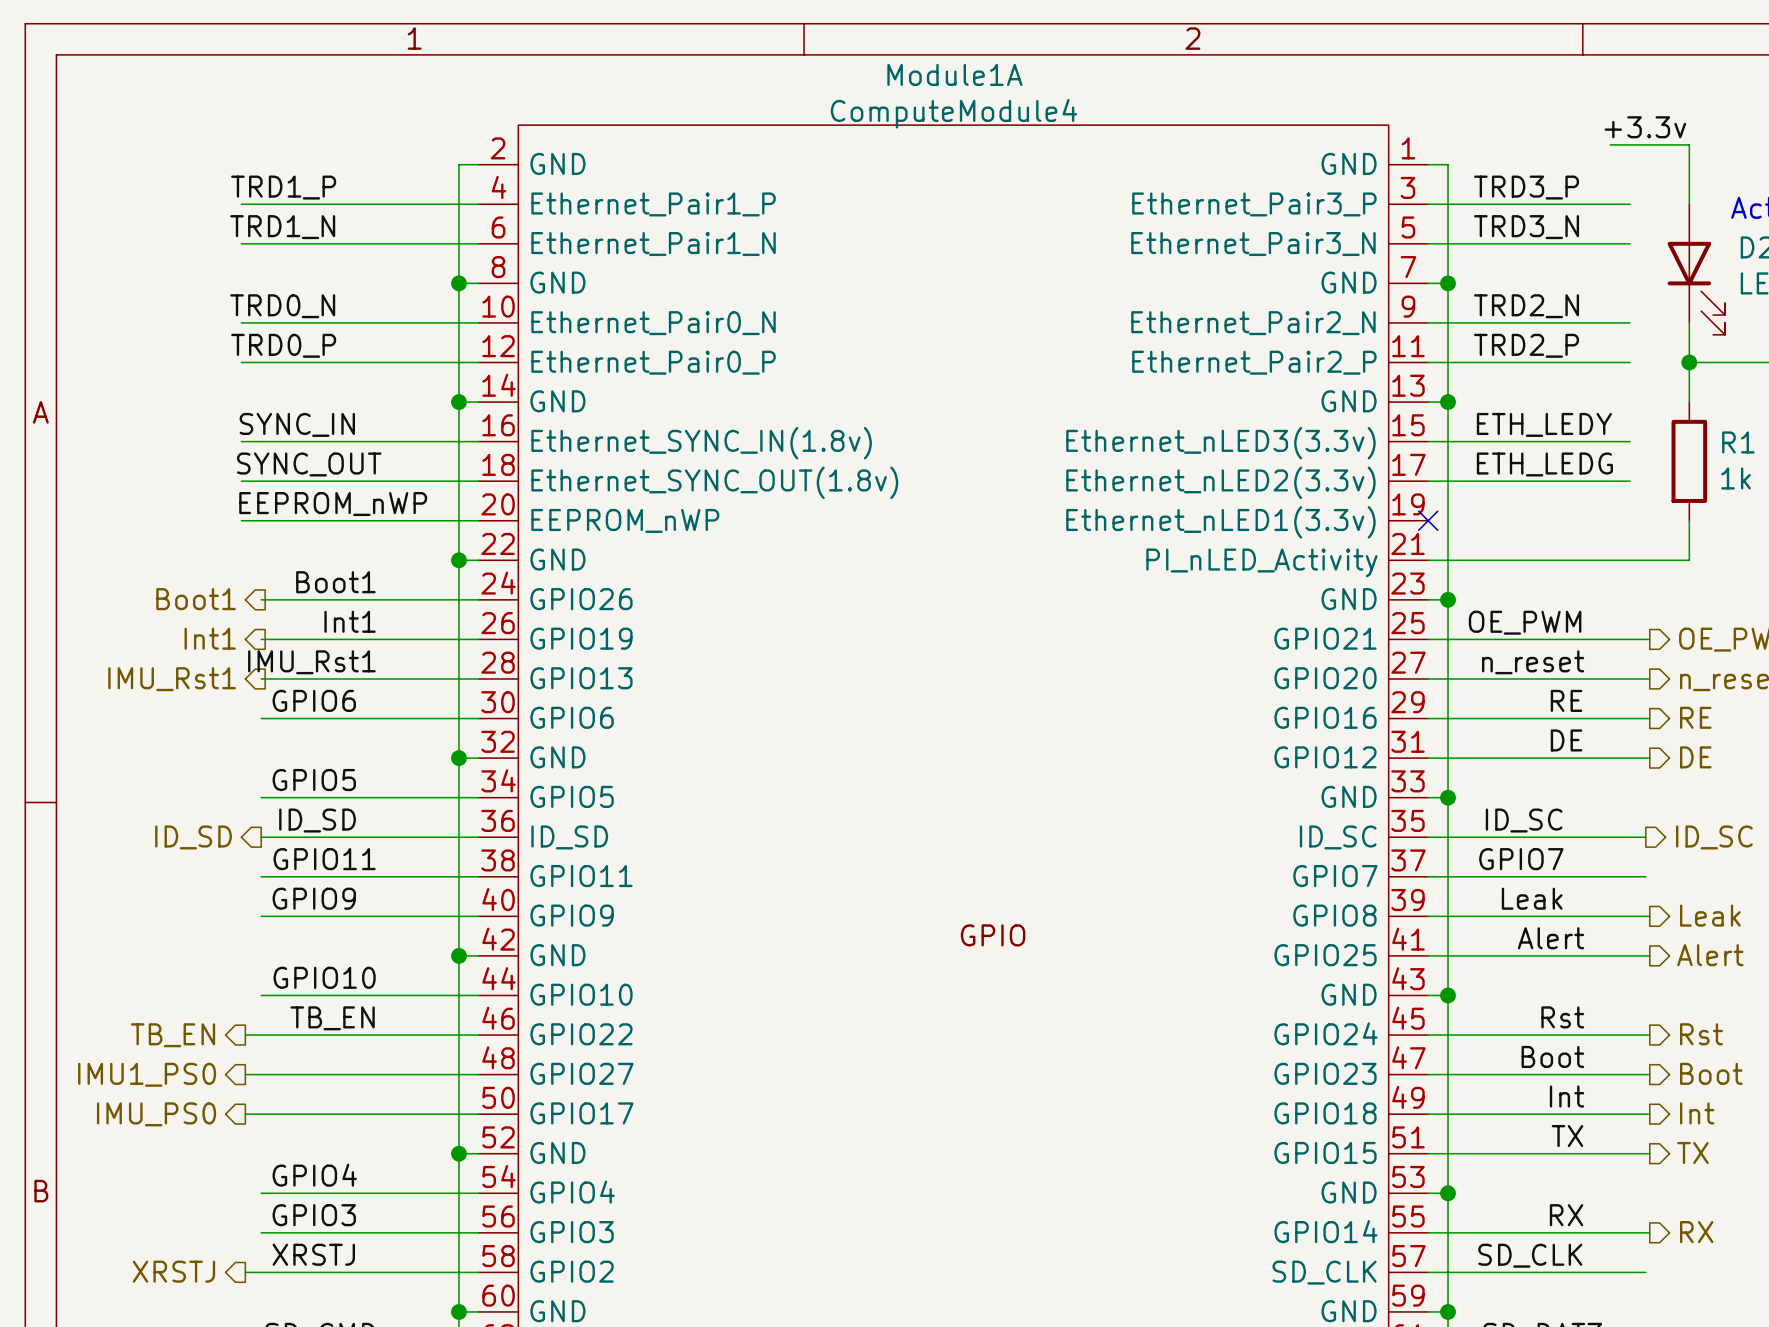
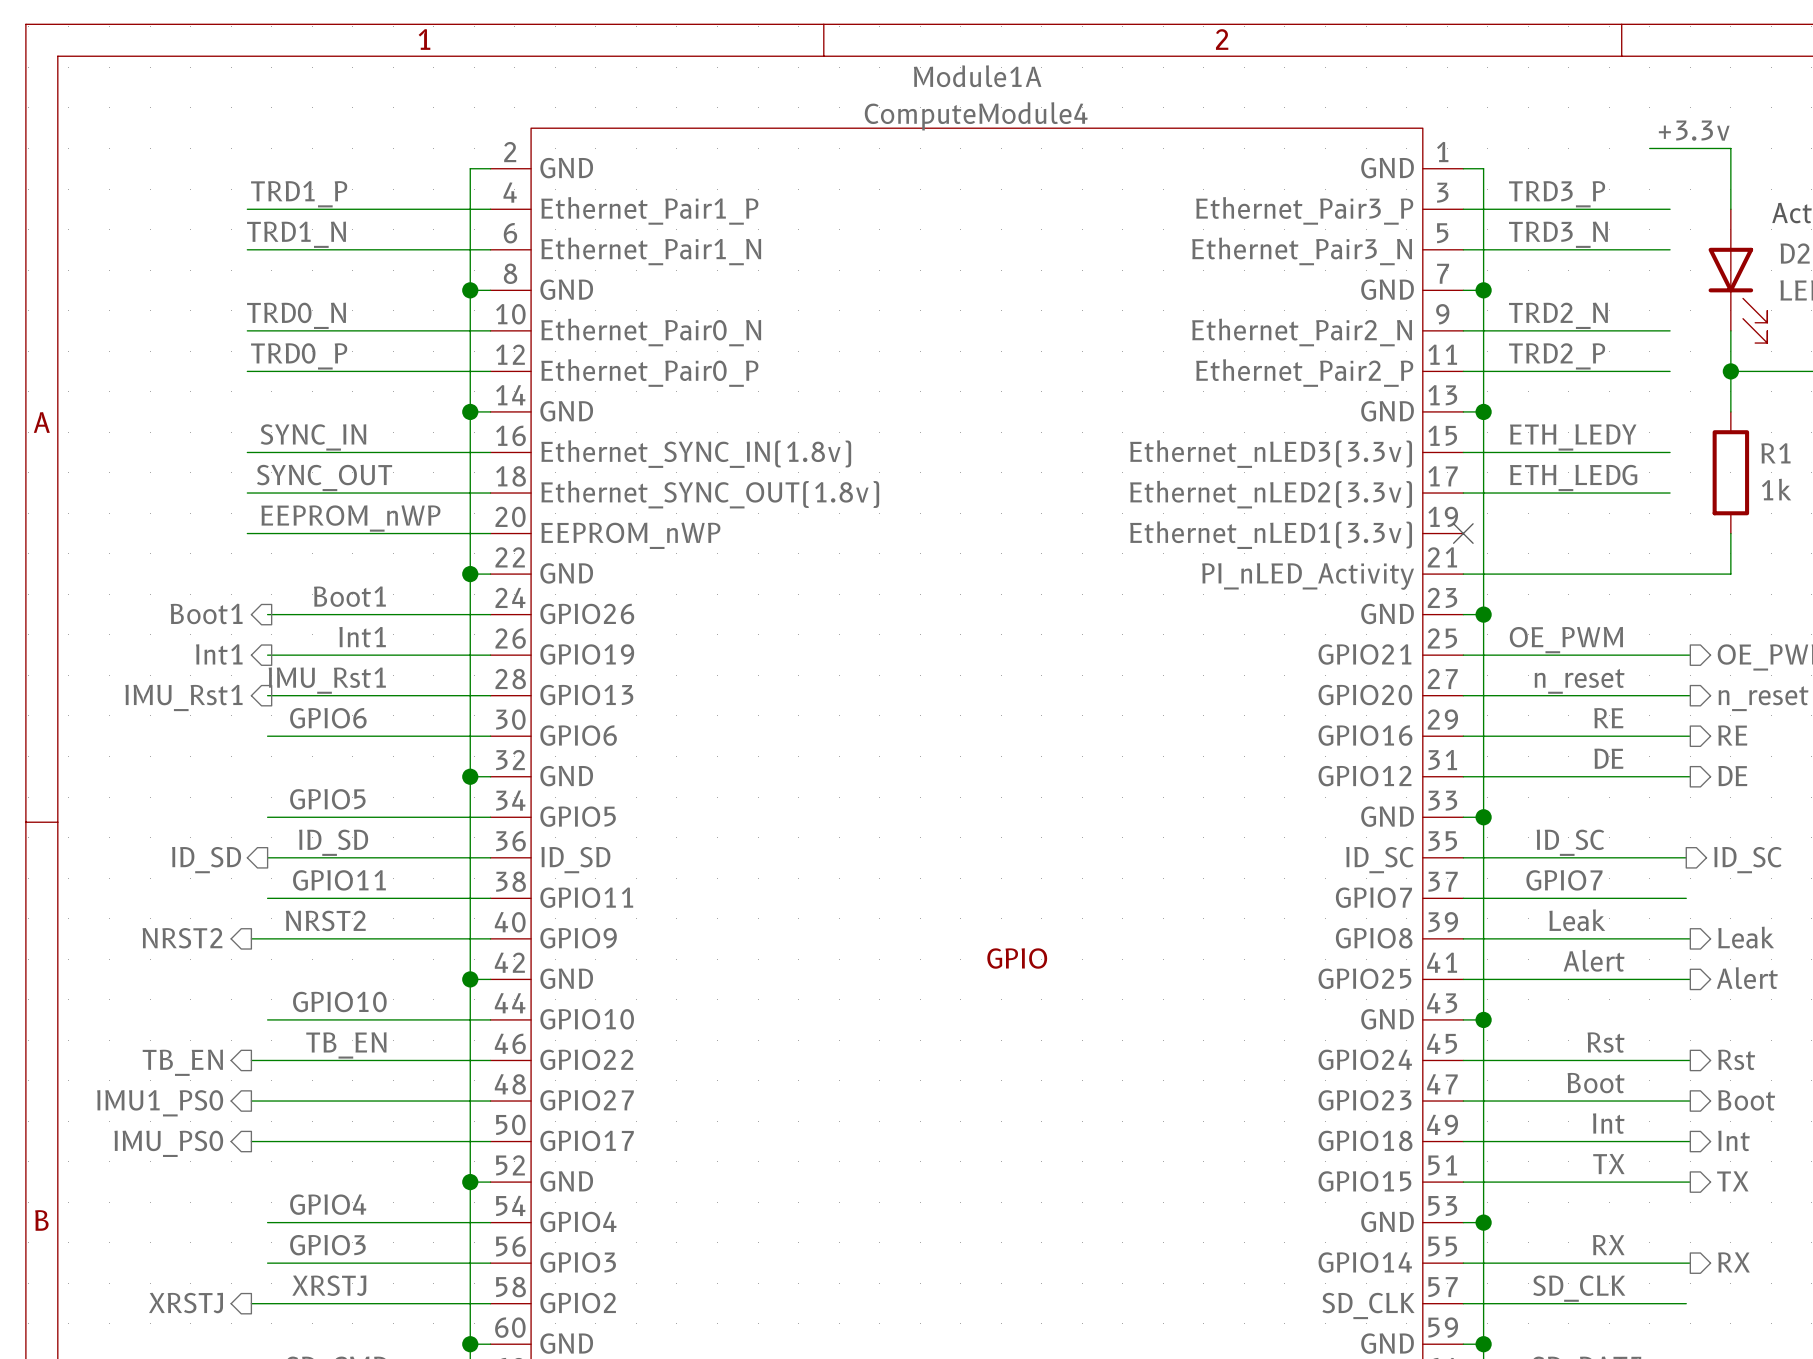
label: GPIO9 (314, 898) -> NRST2 (325, 920)
hierarchical label: none -> NRST2 (182, 938)
wire: none -> (251, 938) (267, 938)

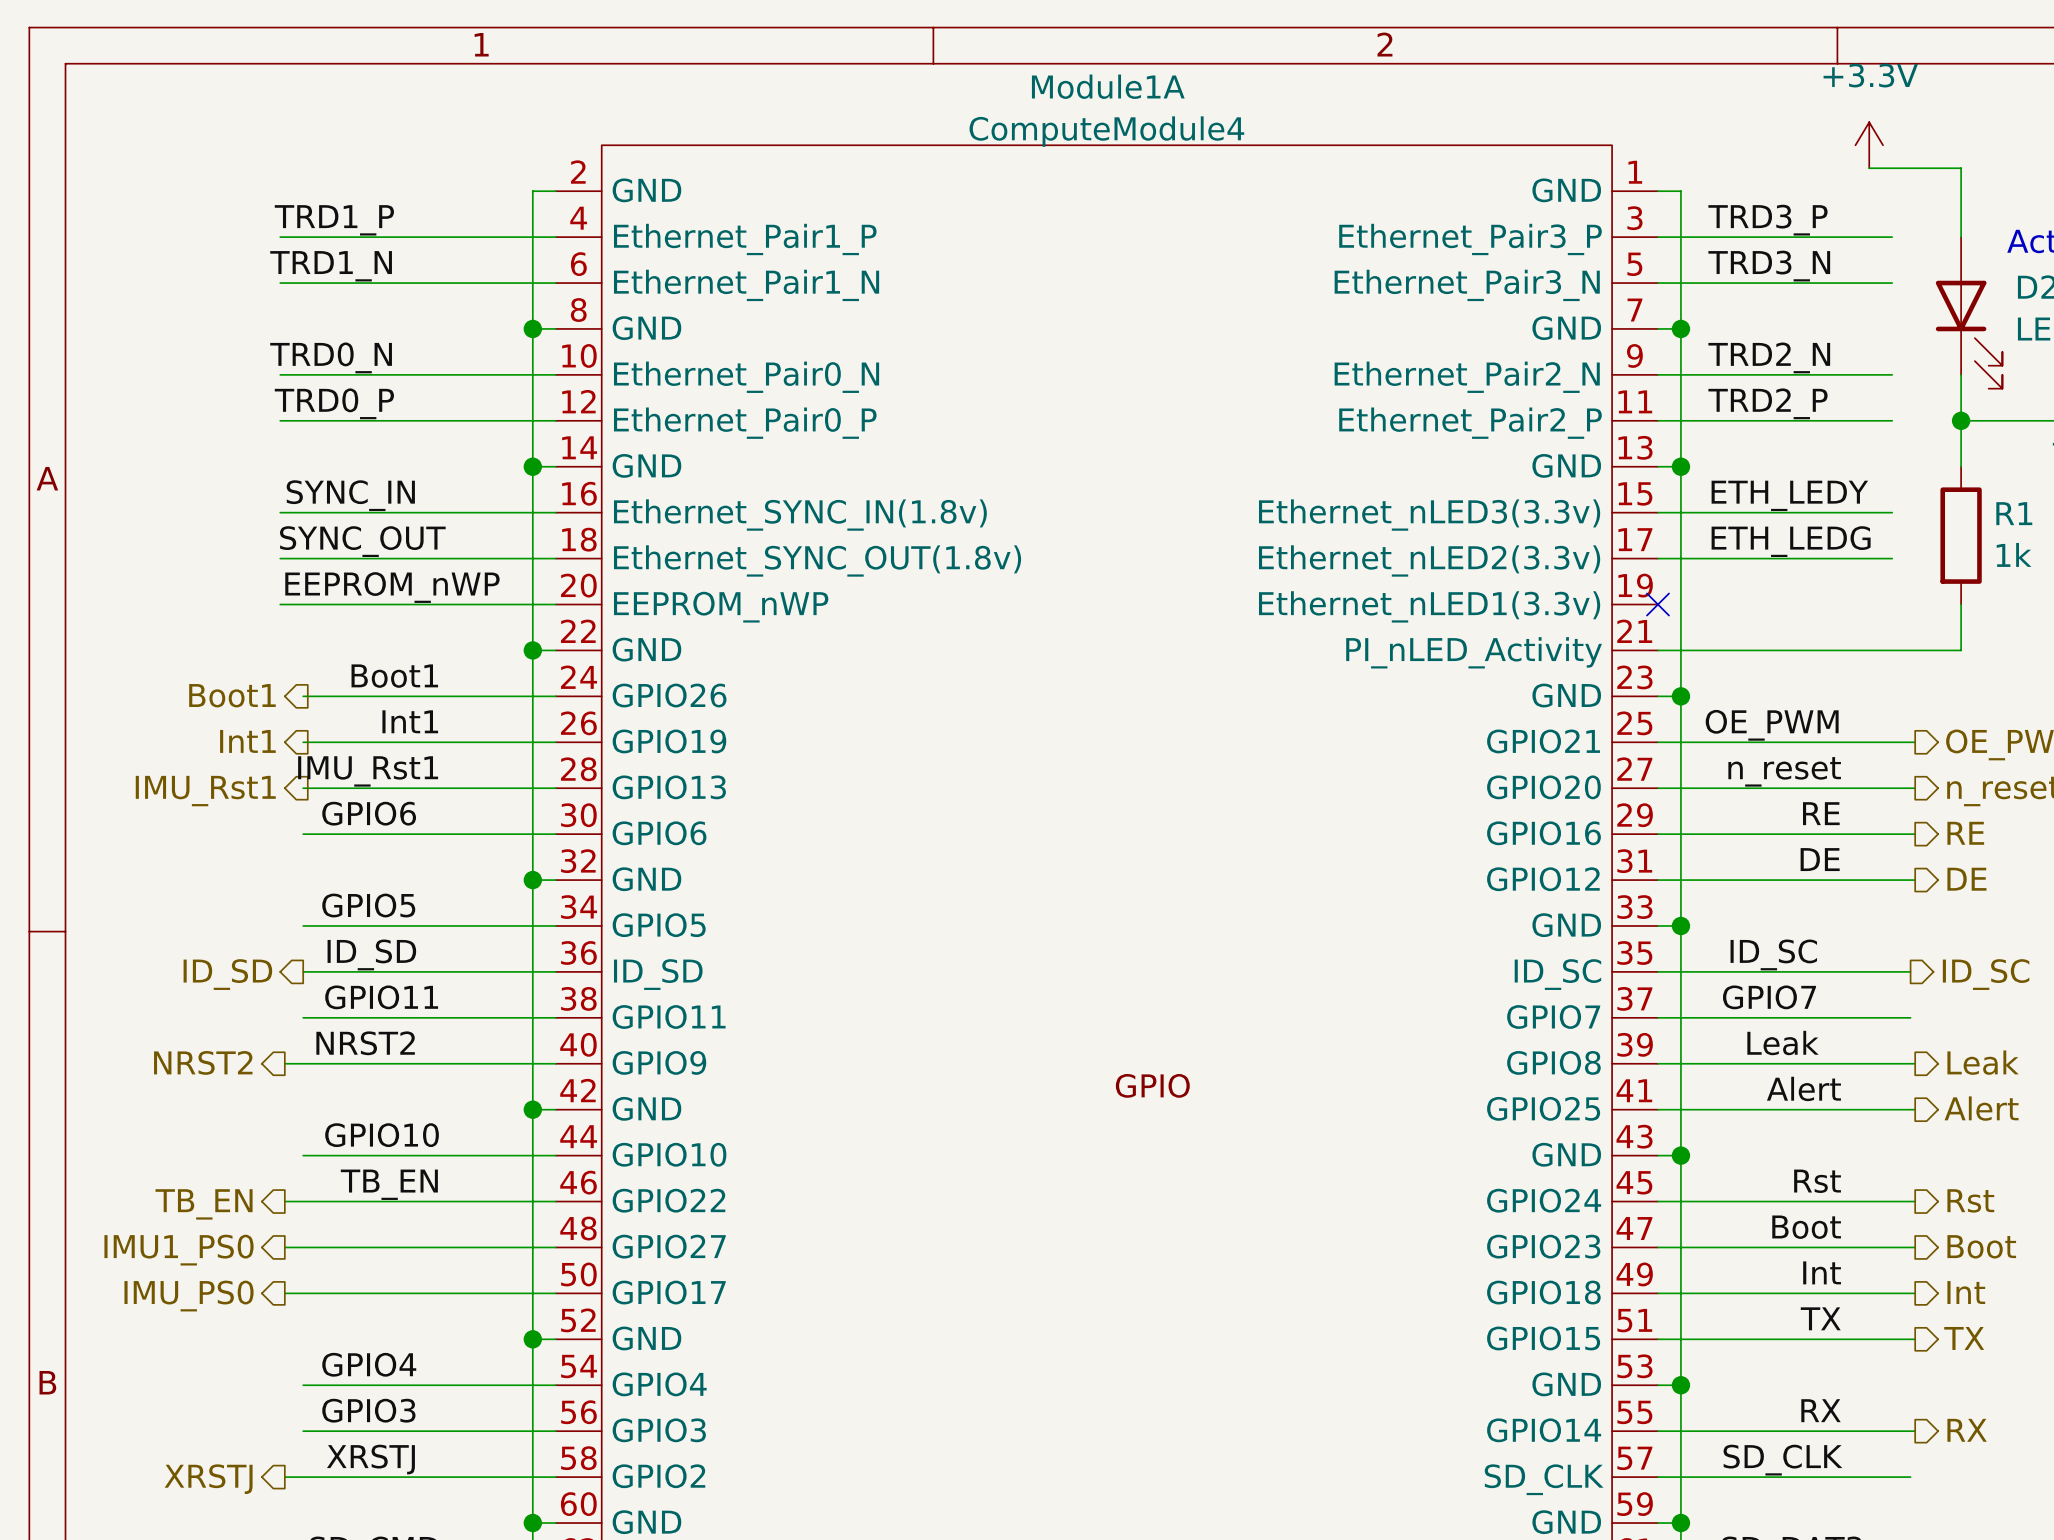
power symbol: none -> +3.3V (1869, 145)
label: +3.3v (1694, 130) -> none

